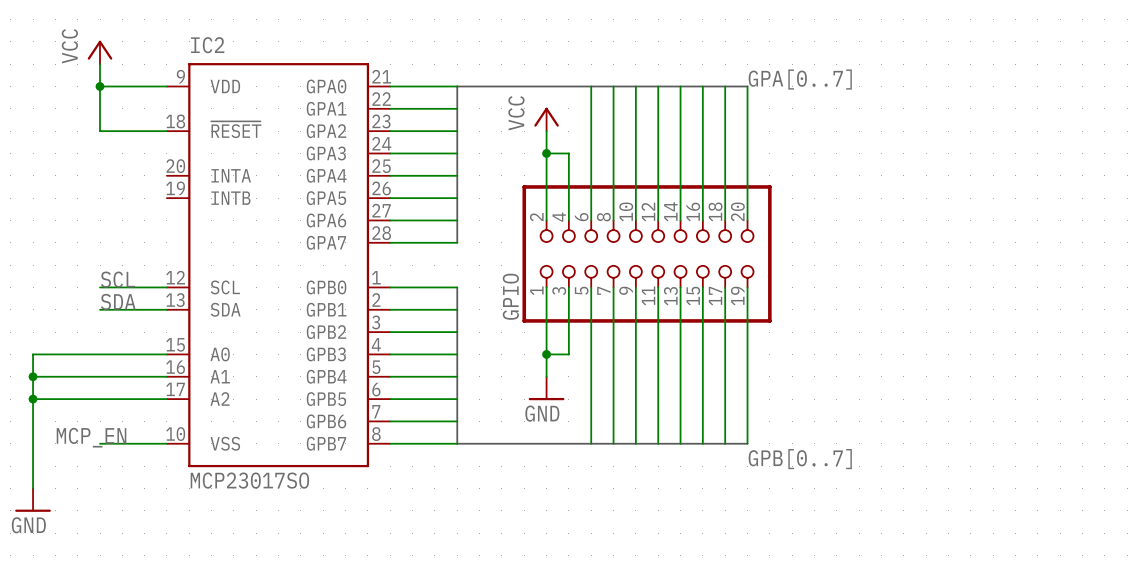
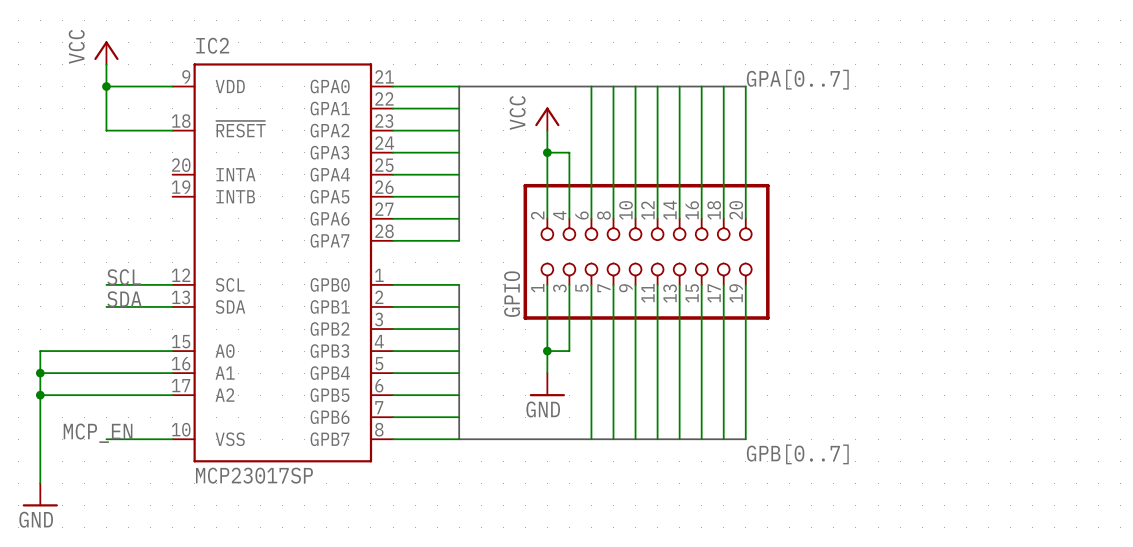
IC2 value: MCP23017SO (249, 480) -> MCP23017SP (254, 475)

